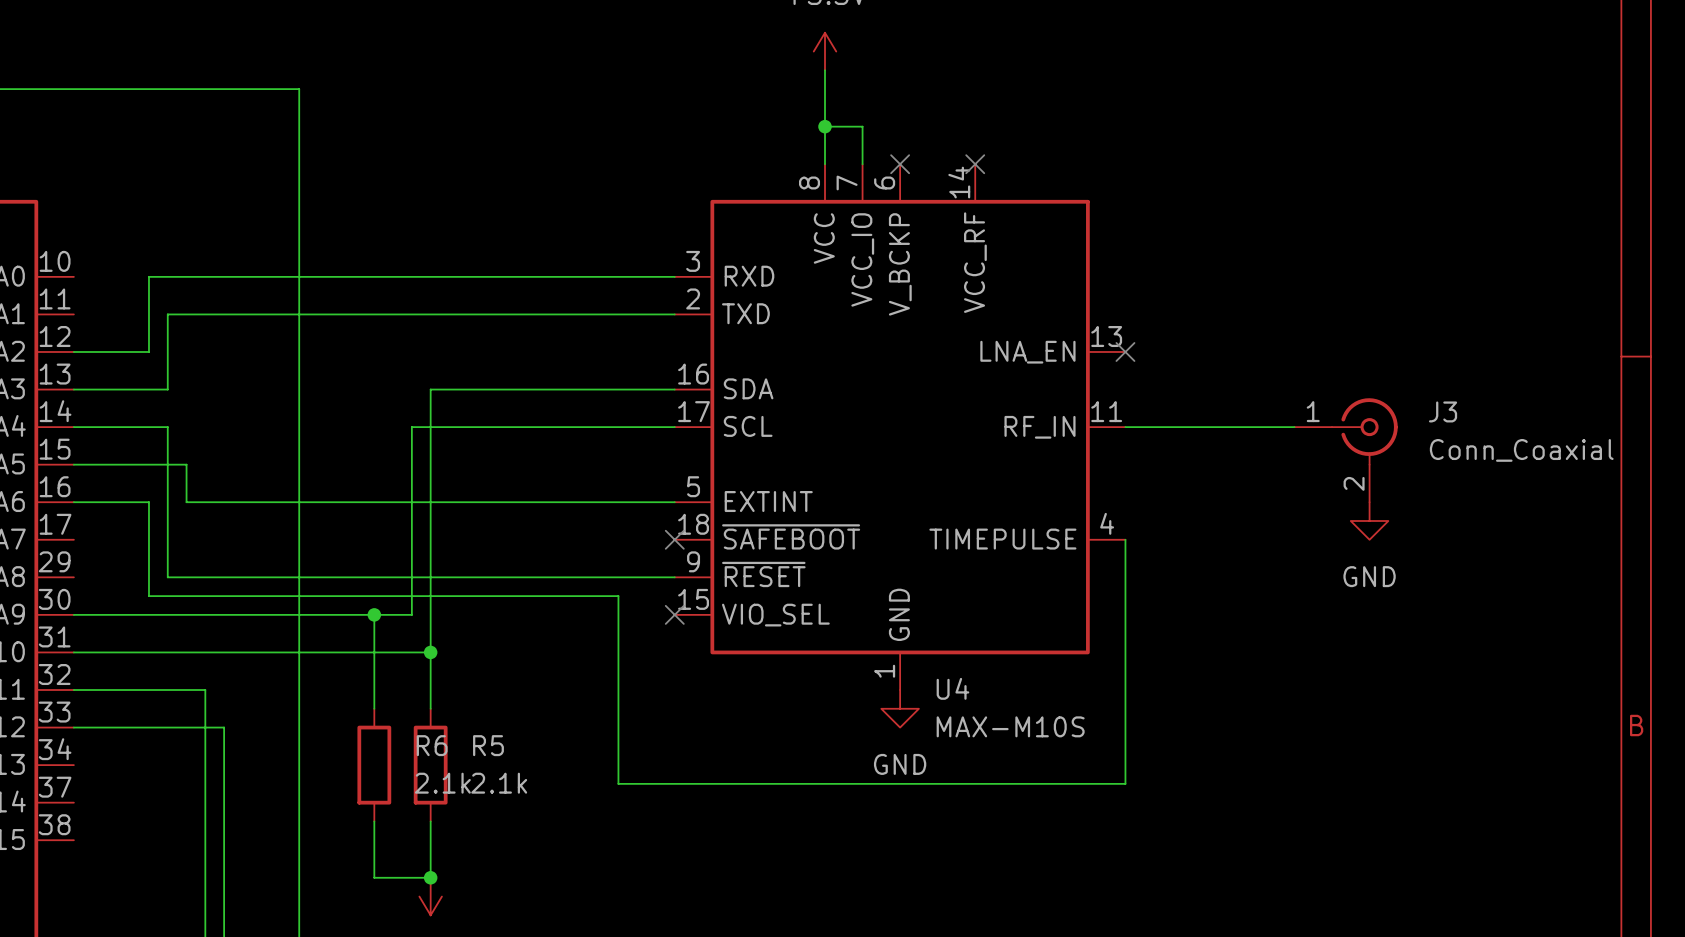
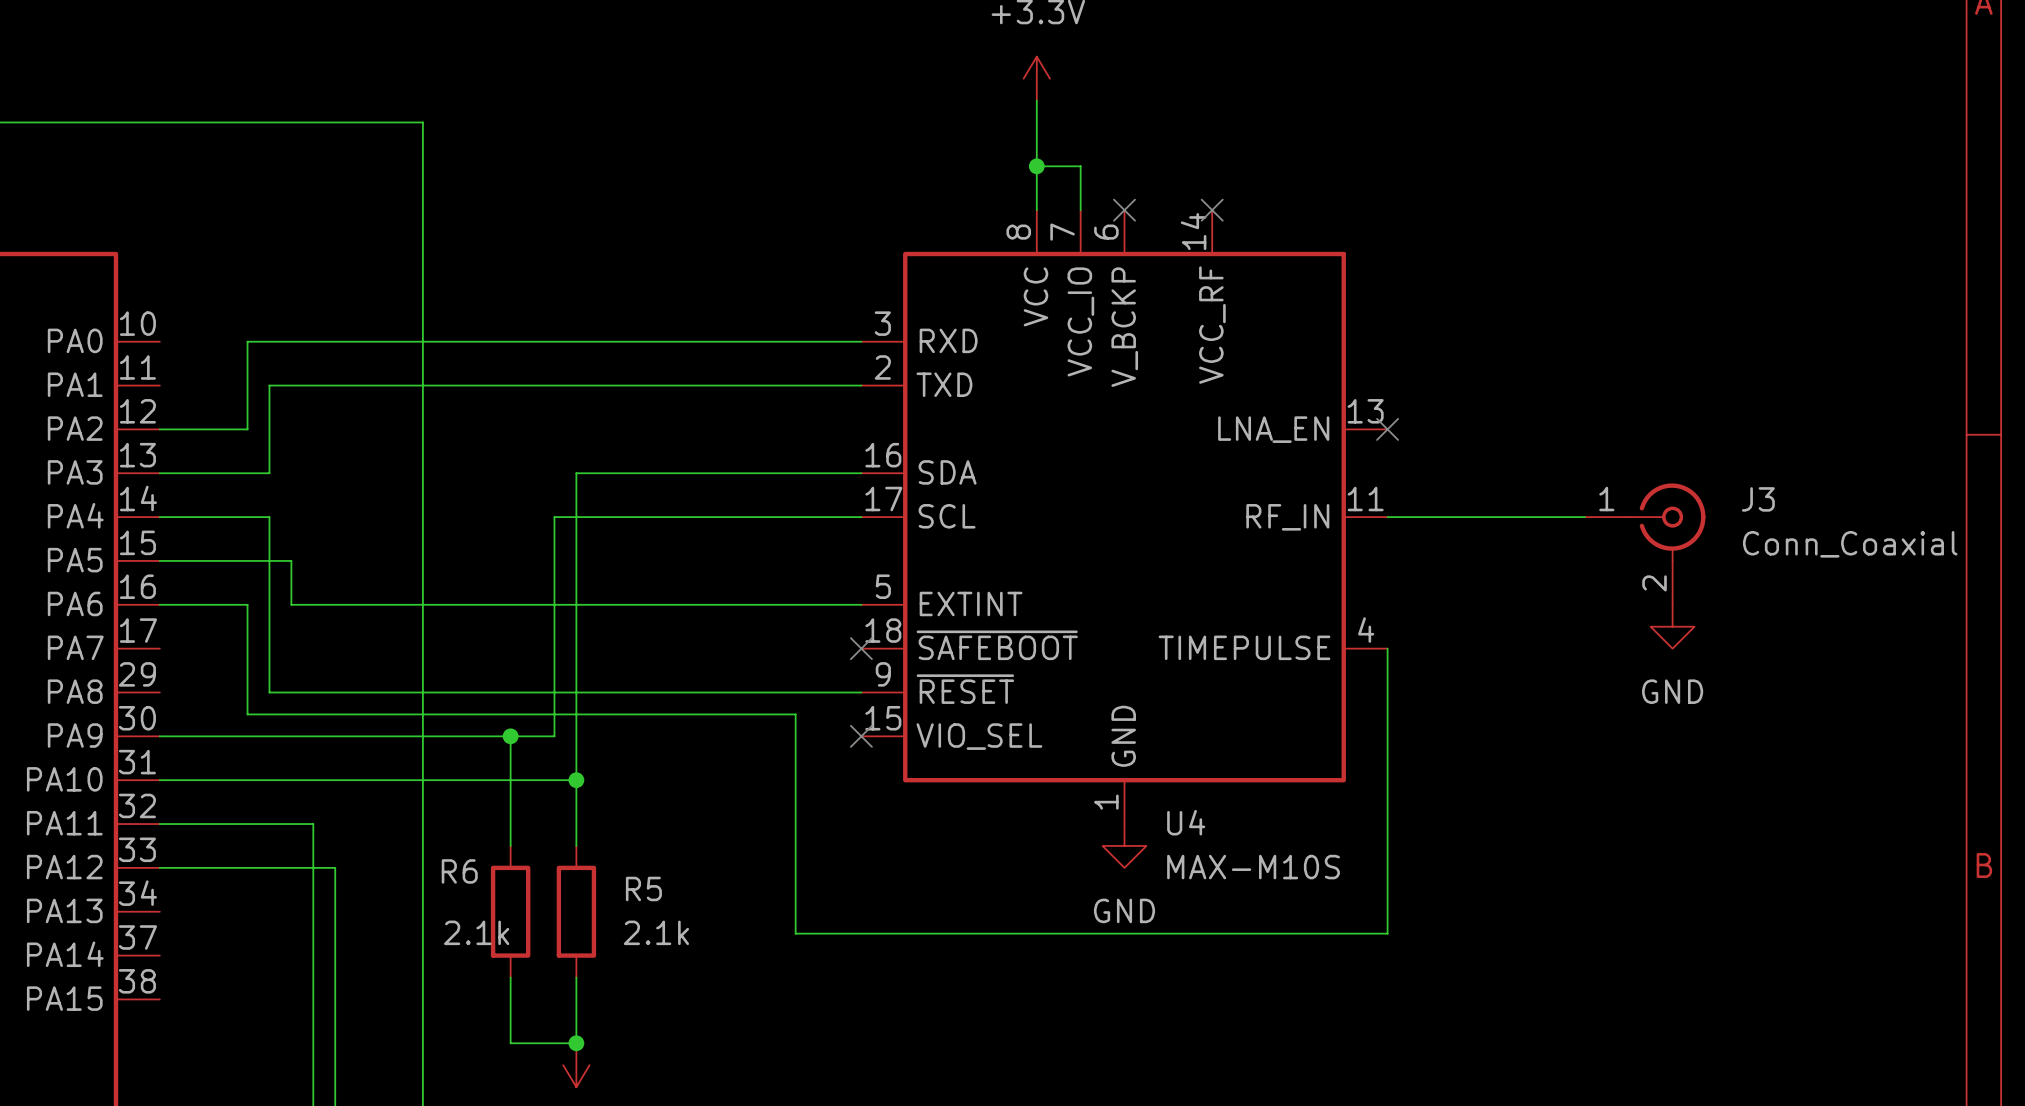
R6 name position: R6 (432, 745) -> R6 (459, 871)
R6 value position: 2.1k (442, 783) -> 2.1k (476, 932)

